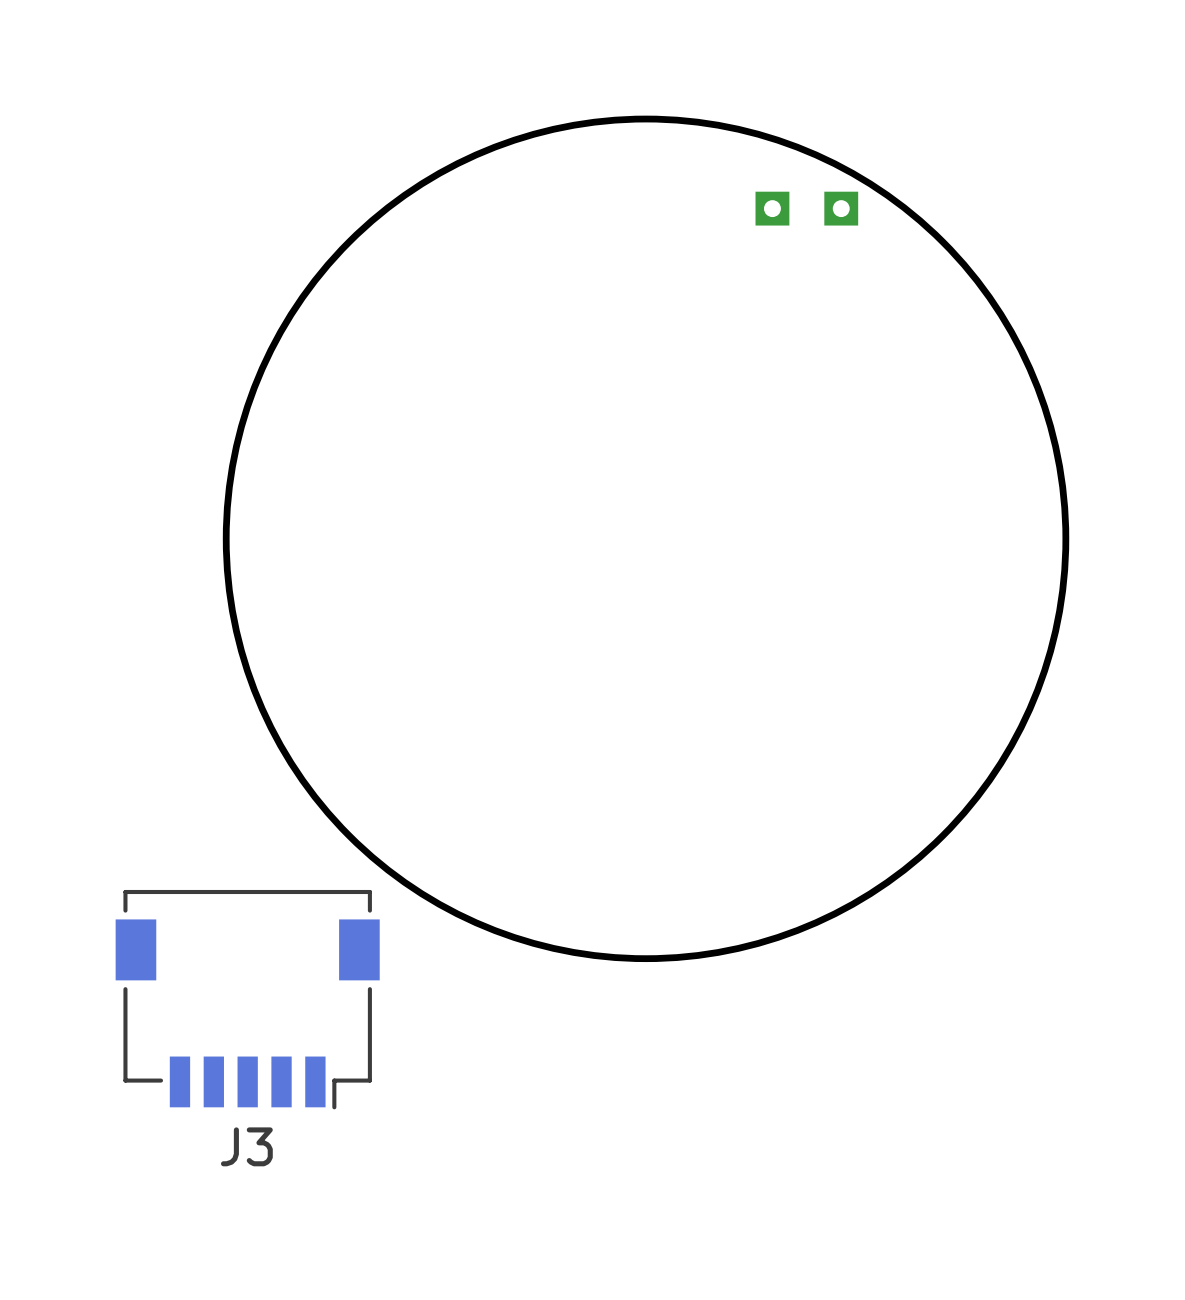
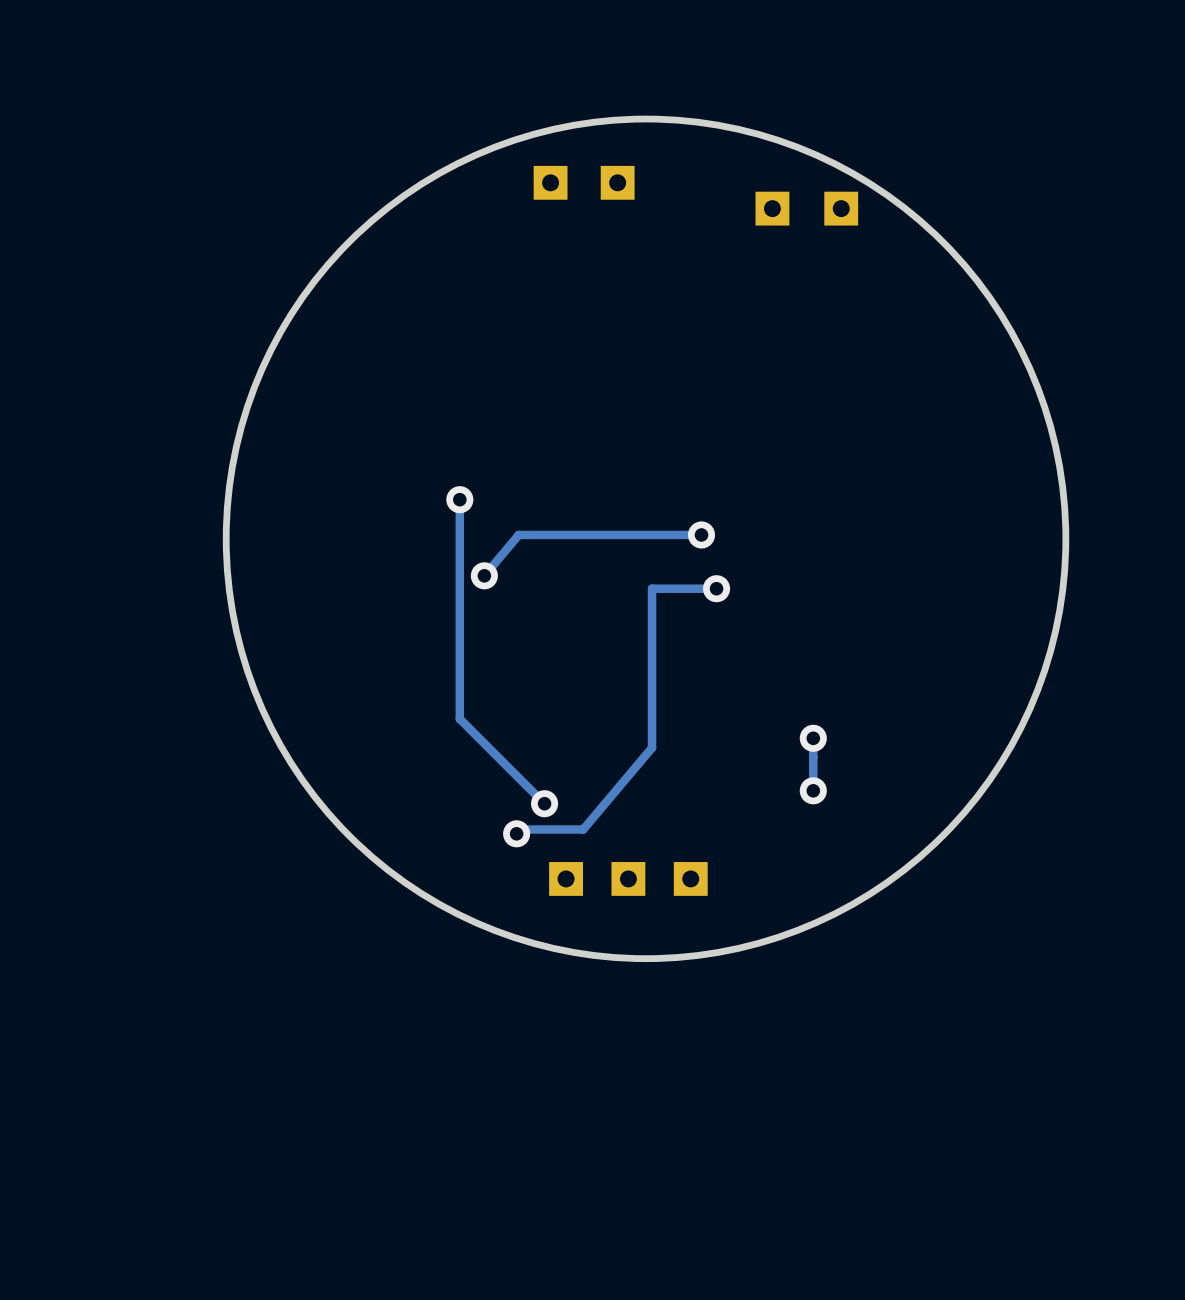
part: none -> (550, 182)
part: none -> (617, 182)
track: none -> (459, 499) (459, 718) (544, 803)
via: none -> (459, 499)
track: none -> (701, 534) (518, 534) (484, 575)
via: none -> (701, 534)
via: none -> (484, 575)
track: none -> (716, 588) (652, 588) (652, 747) (583, 829) (518, 829)
via: none -> (716, 588)
track: none -> (813, 738) (813, 790)
via: none -> (813, 738)
via: none -> (813, 790)
via: none -> (544, 803)
via: none -> (516, 833)
part: none -> (566, 878)
part: none -> (628, 878)
part: none -> (690, 878)
J3: (247, 999) -> none

